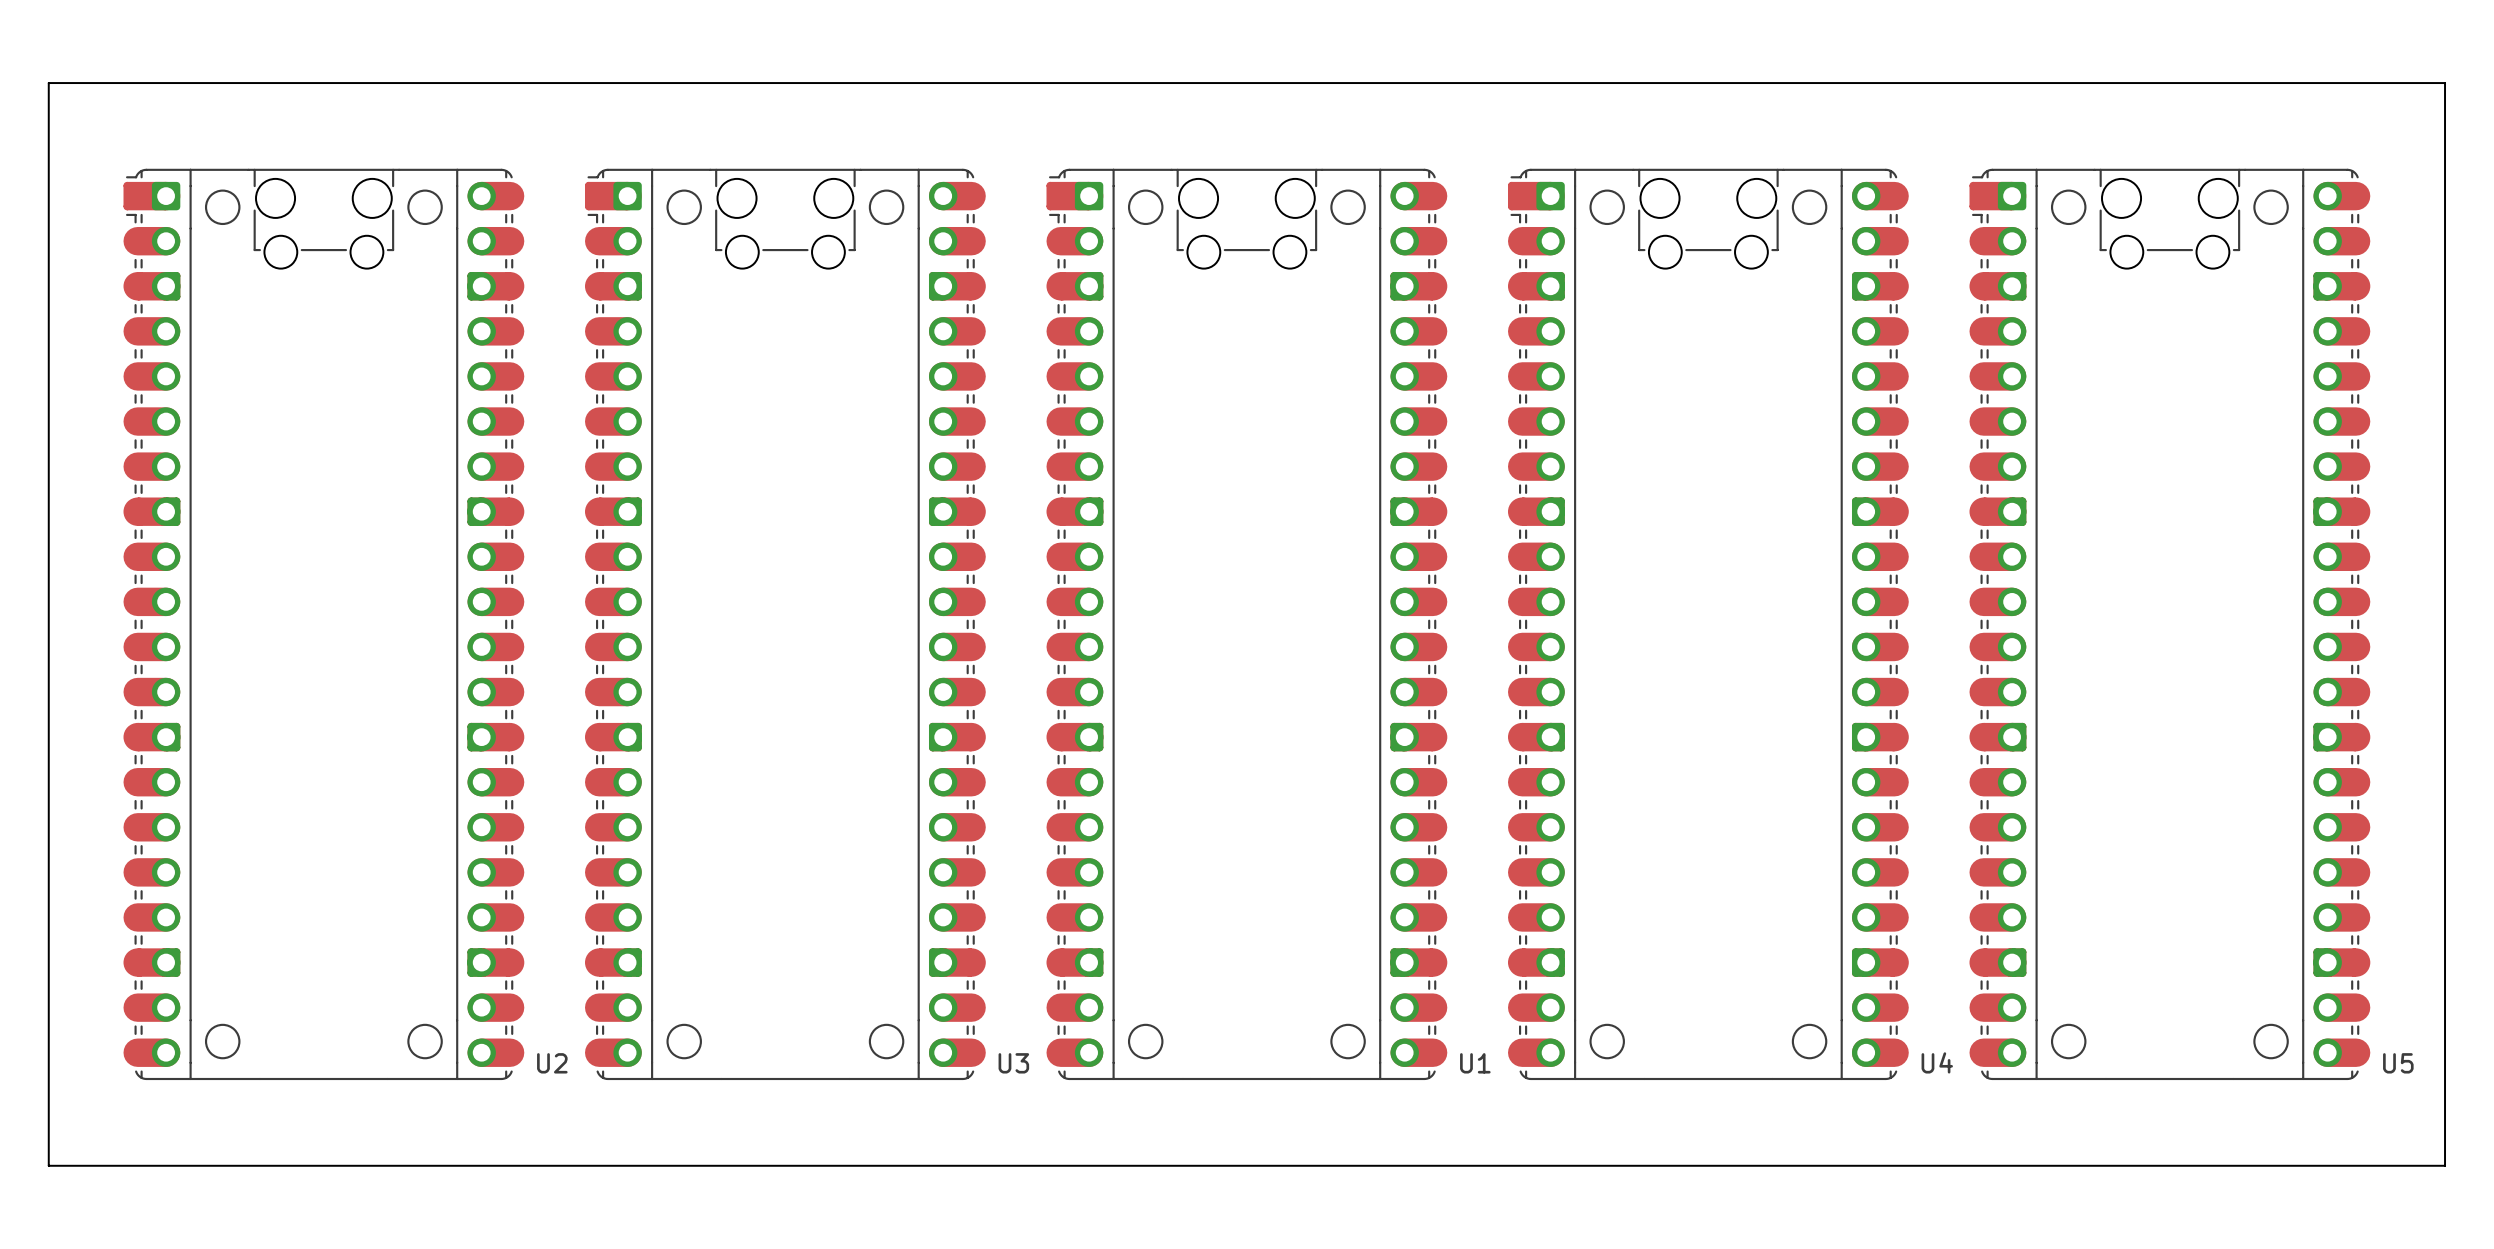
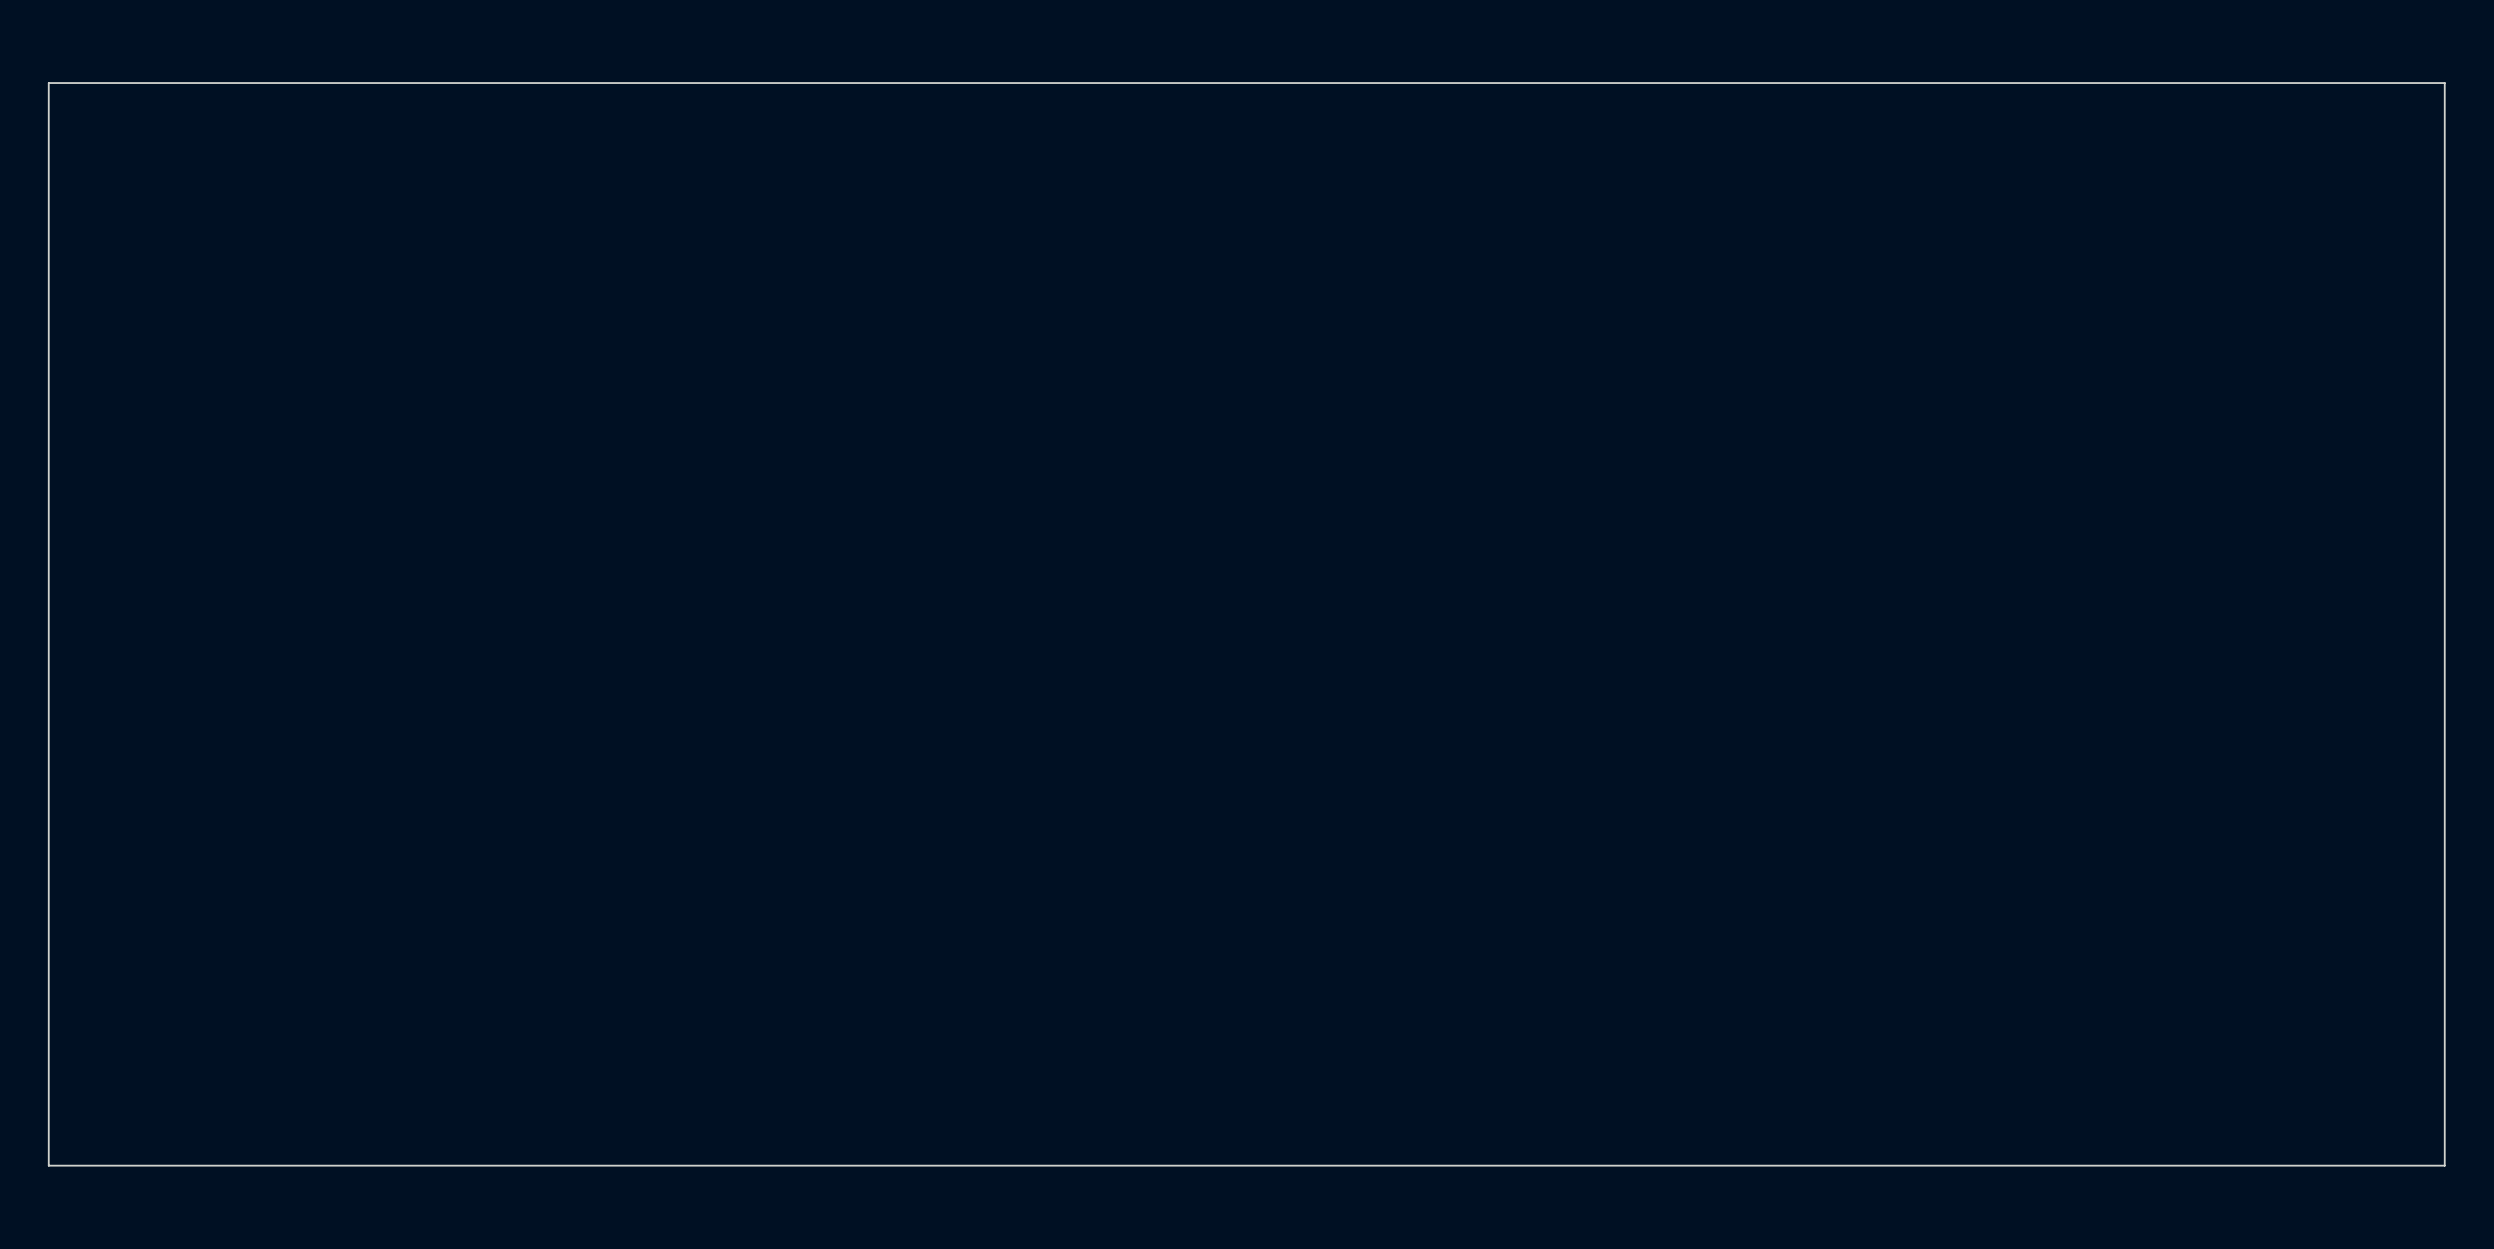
U2: (323, 624) -> none
U3: (785, 624) -> none
U1: (1246, 624) -> none
U4: (1708, 624) -> none
U5: (2169, 624) -> none

